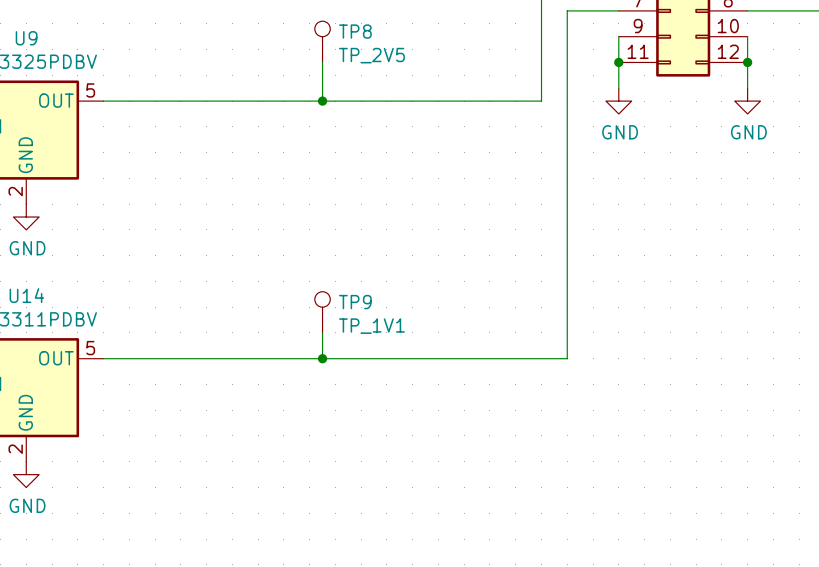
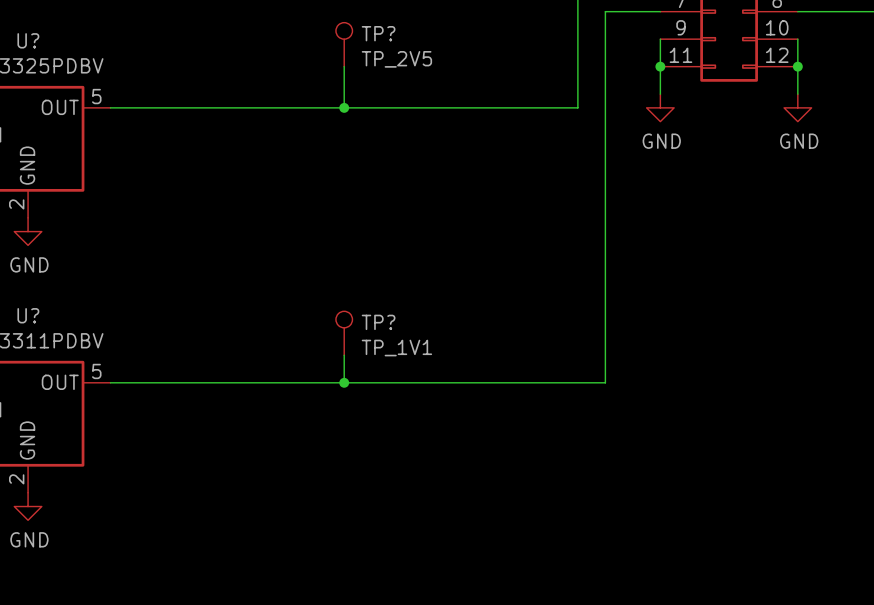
TP8 name: TP8 (355, 31) -> TP? (378, 33)
U9 name: U9 (26, 38) -> U? (28, 40)
U14 name: U14 (26, 295) -> U? (28, 315)
TP9 name: TP9 (355, 302) -> TP? (378, 322)

